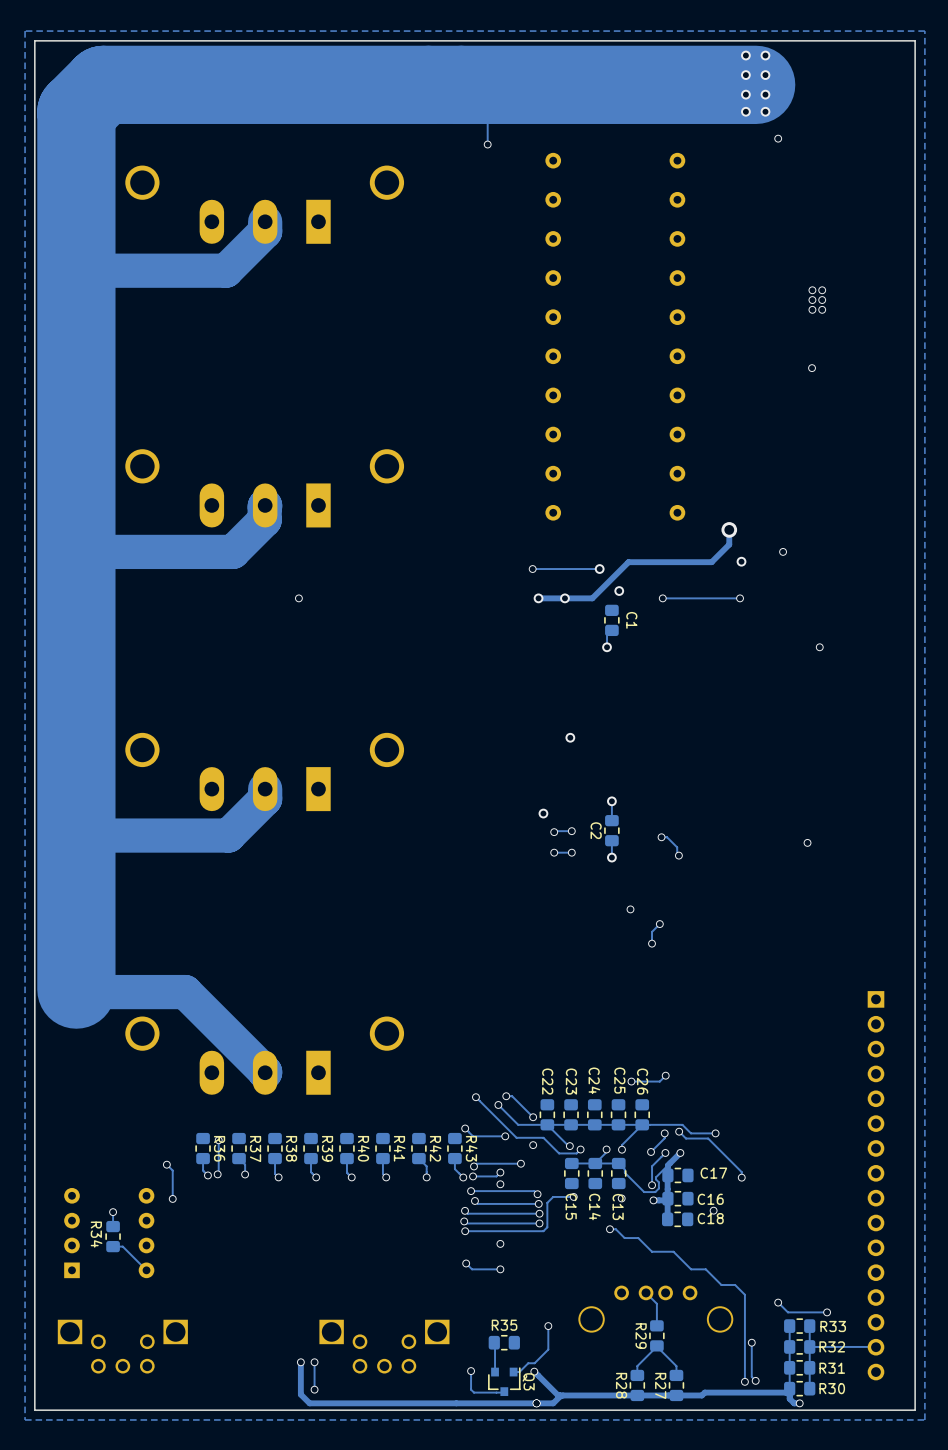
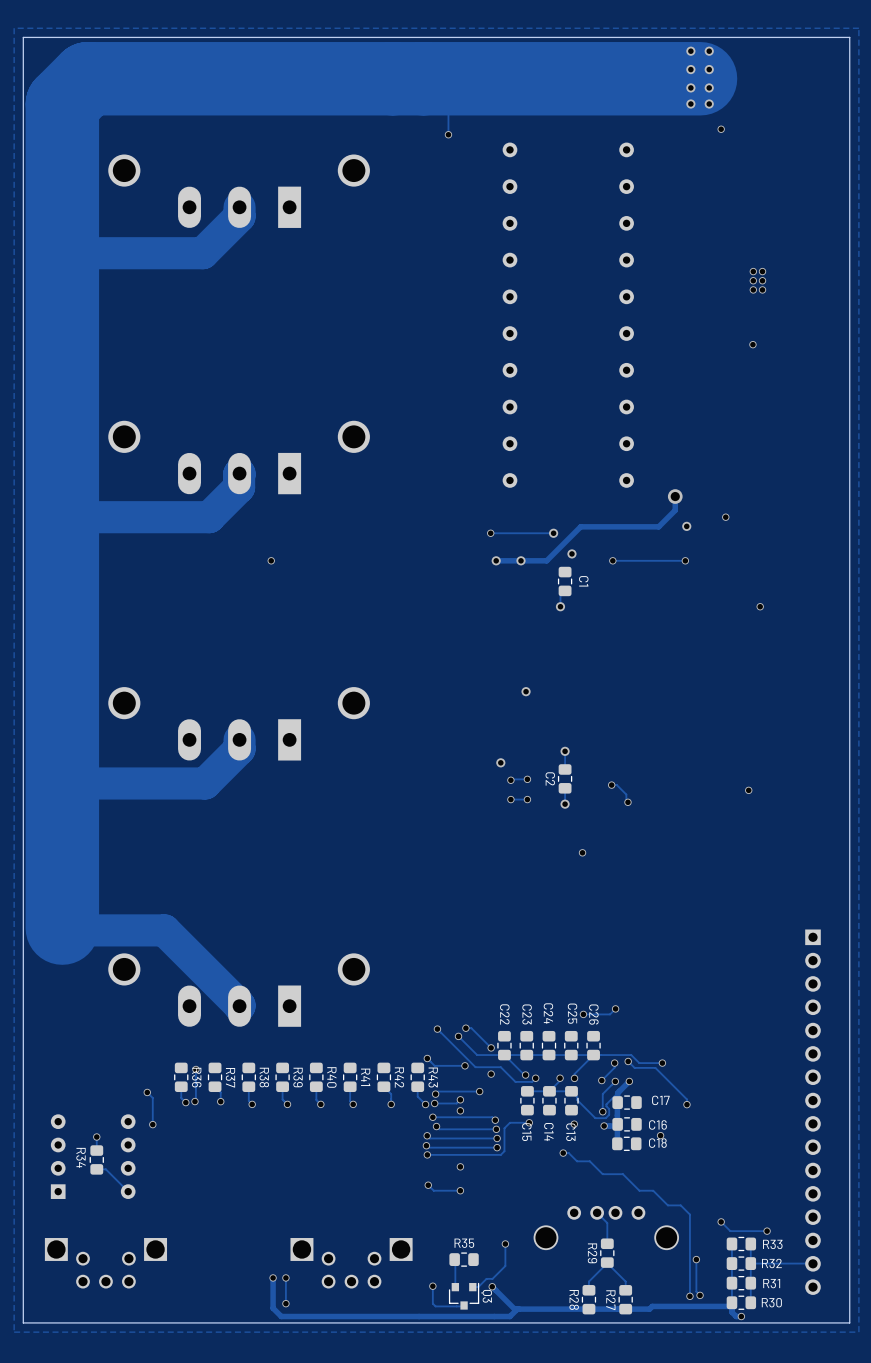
track: (659, 924) (652, 931) (652, 943) -> none
via: (659, 924) -> none
via: (652, 943) -> none
via: (536, 1403) -> none

